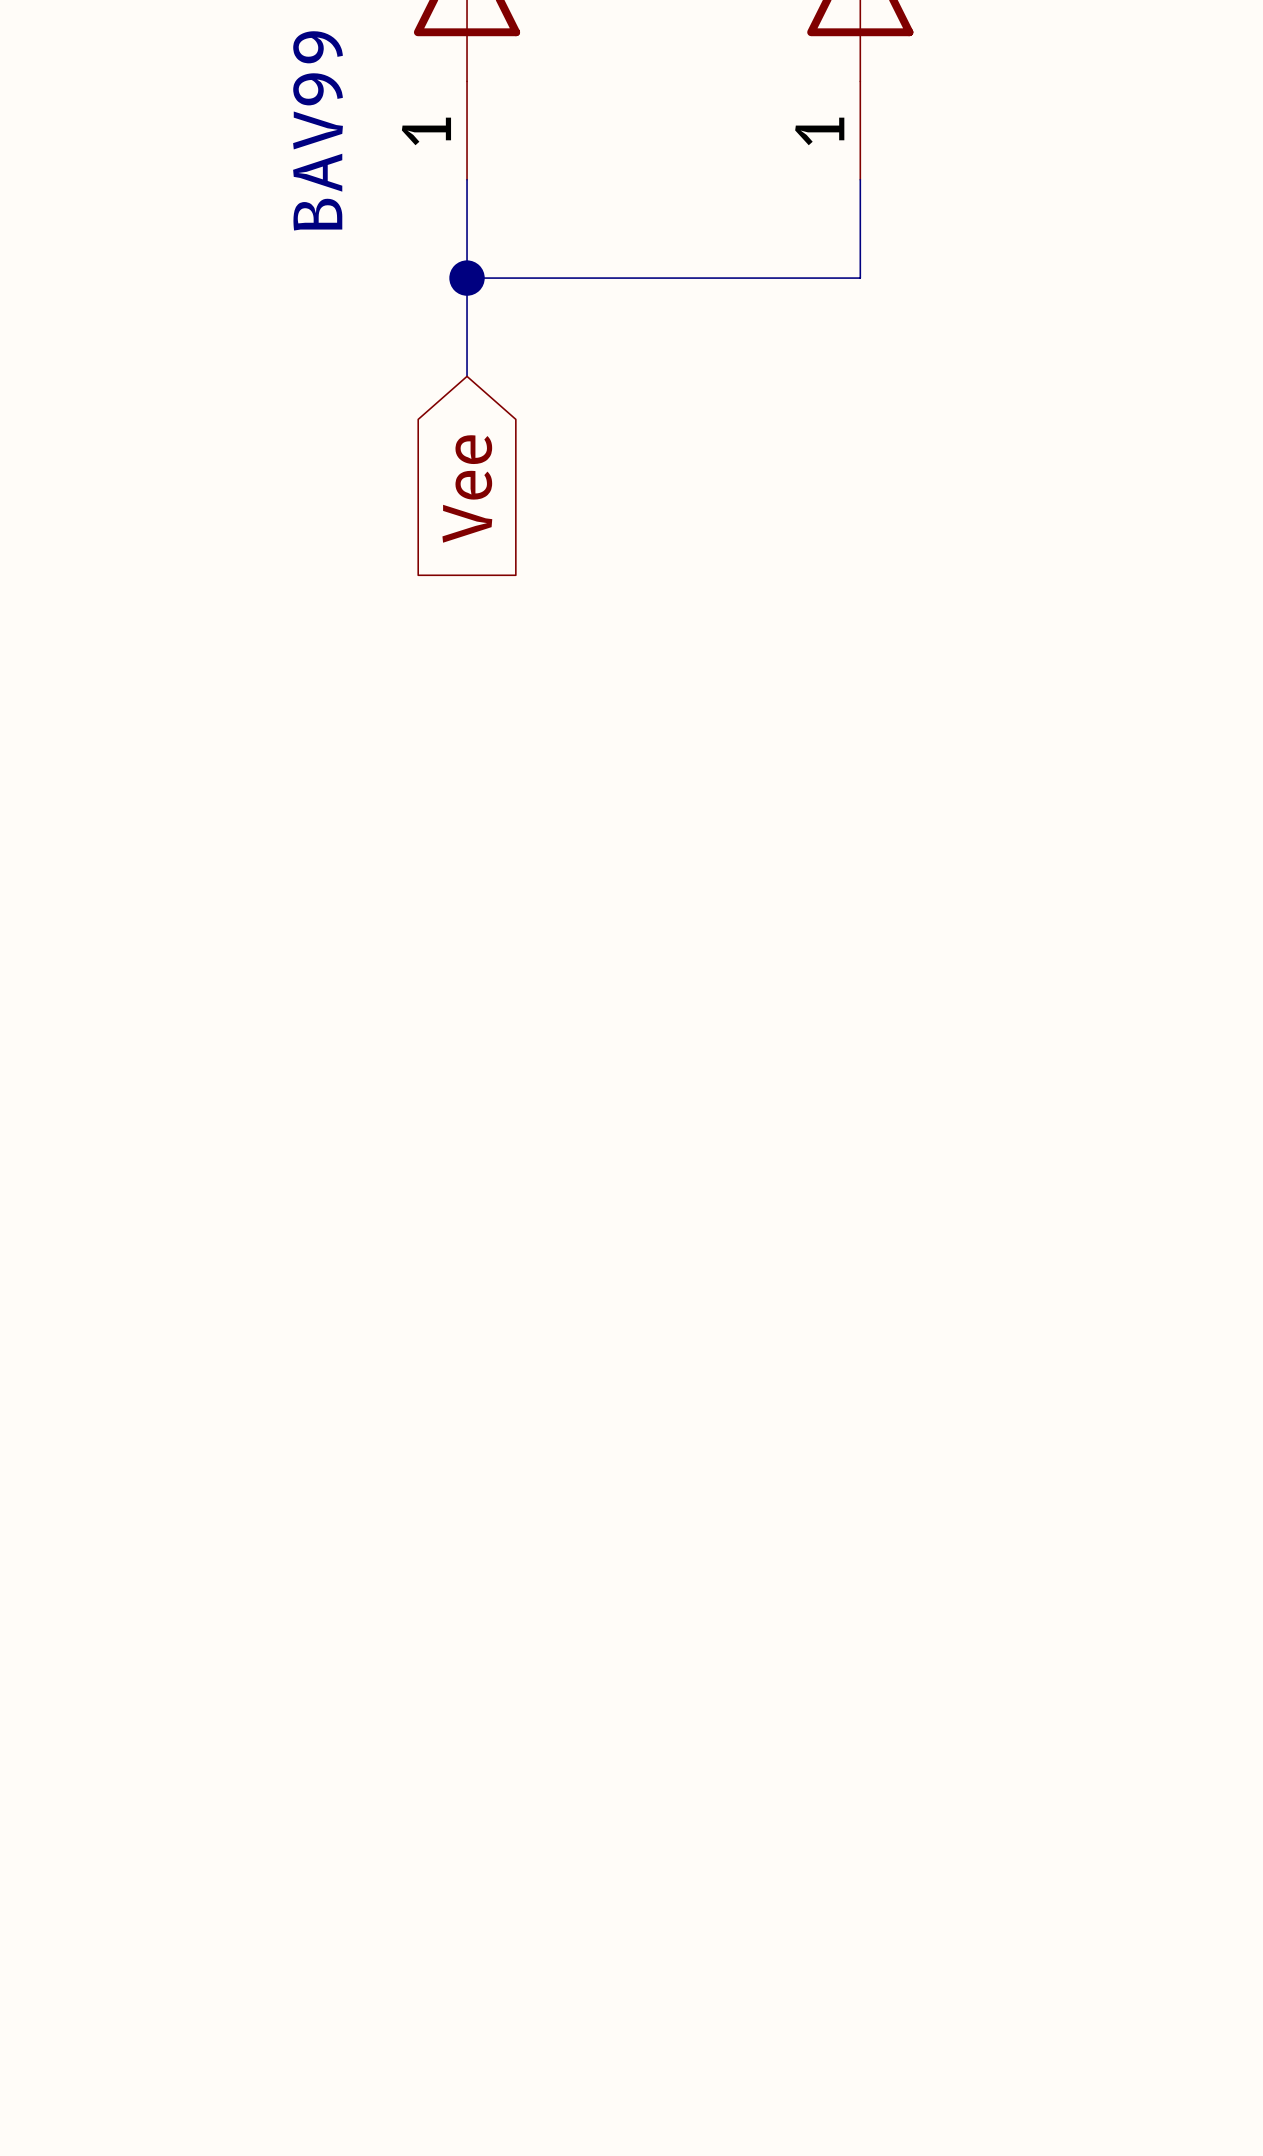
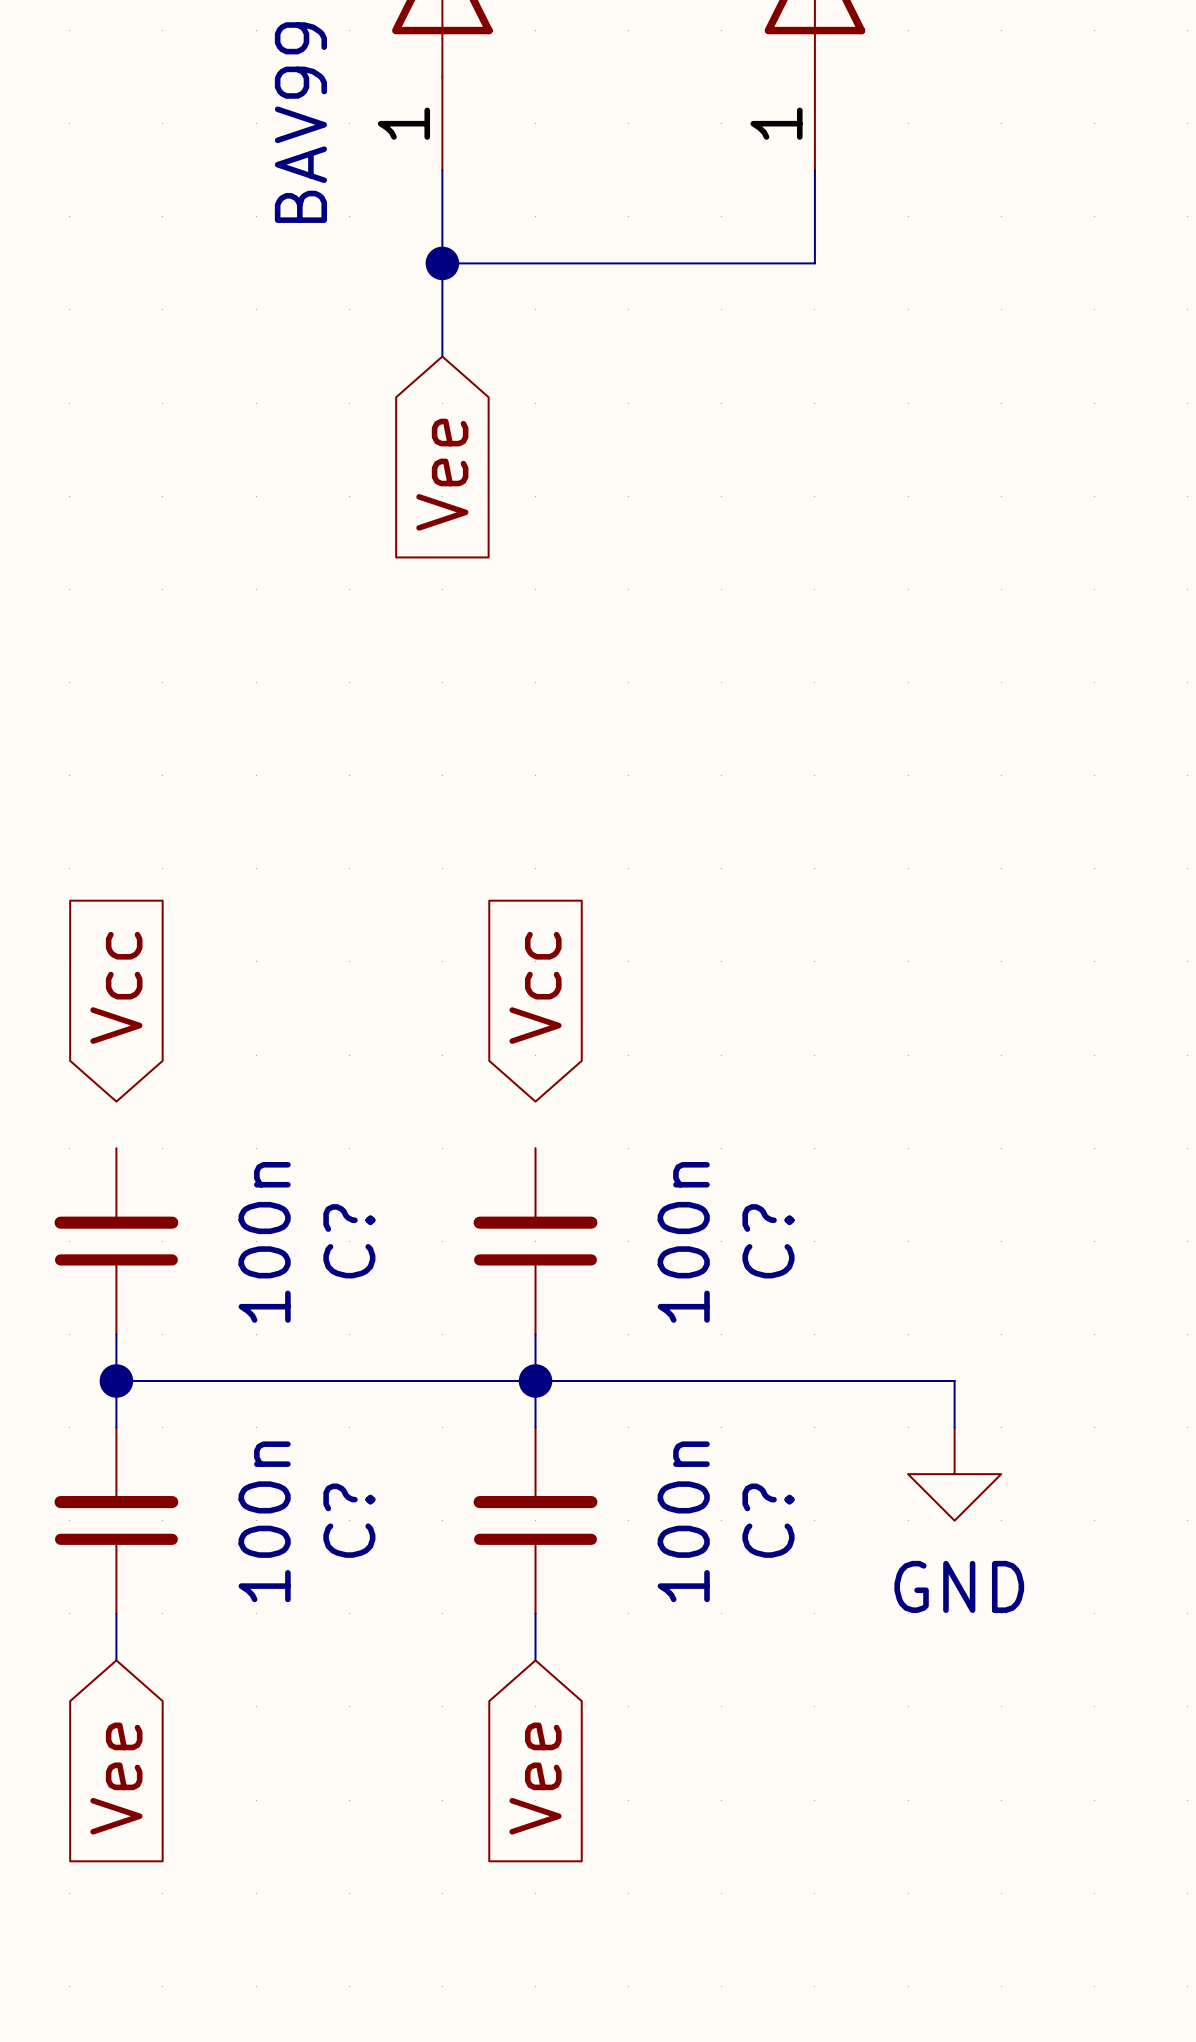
global label: none -> Vcc (116, 987)
global label: none -> Vcc (535, 987)
C?: none -> 100n (116, 1241)
C?: none -> 100n (535, 1241)
wire: none -> (116, 1334) (116, 1427)
wire: none -> (535, 1334) (535, 1427)
wire: none -> (116, 1380) (954, 1380) (954, 1427)
junction: none -> (116, 1380)
junction: none -> (535, 1380)
power symbol: none -> GND (954, 1474)
C?: none -> 100n (116, 1520)
C?: none -> 100n (535, 1520)
wire: none -> (116, 1613) (116, 1660)
wire: none -> (535, 1613) (535, 1660)
global label: none -> Vee (116, 1778)
global label: none -> Vee (535, 1778)

